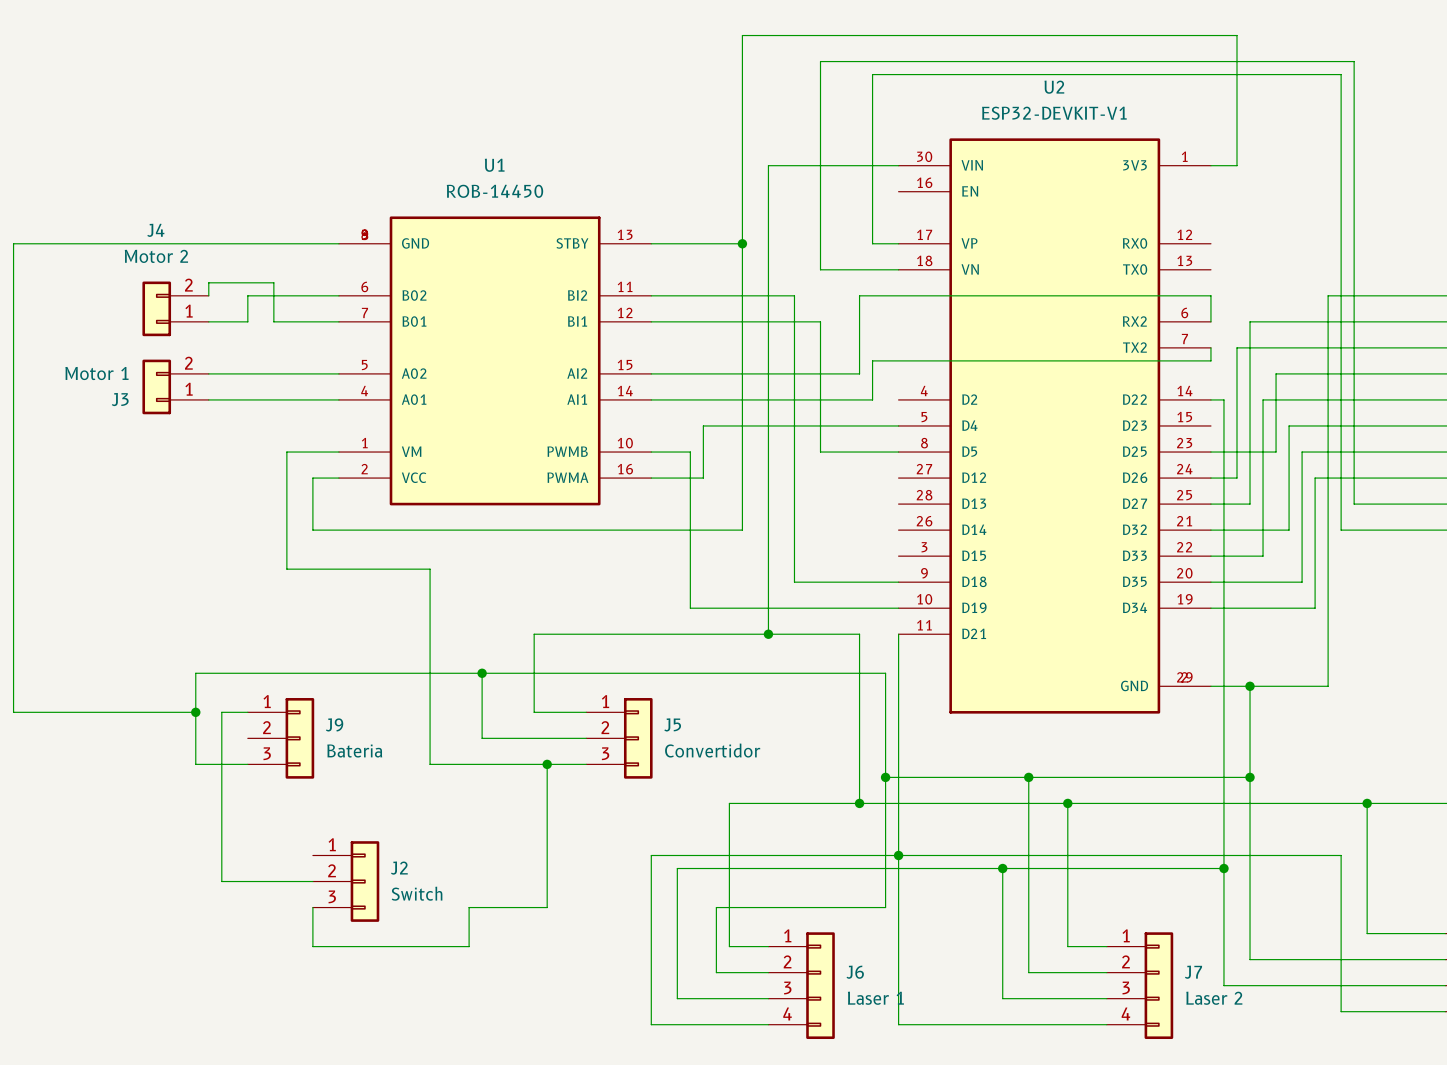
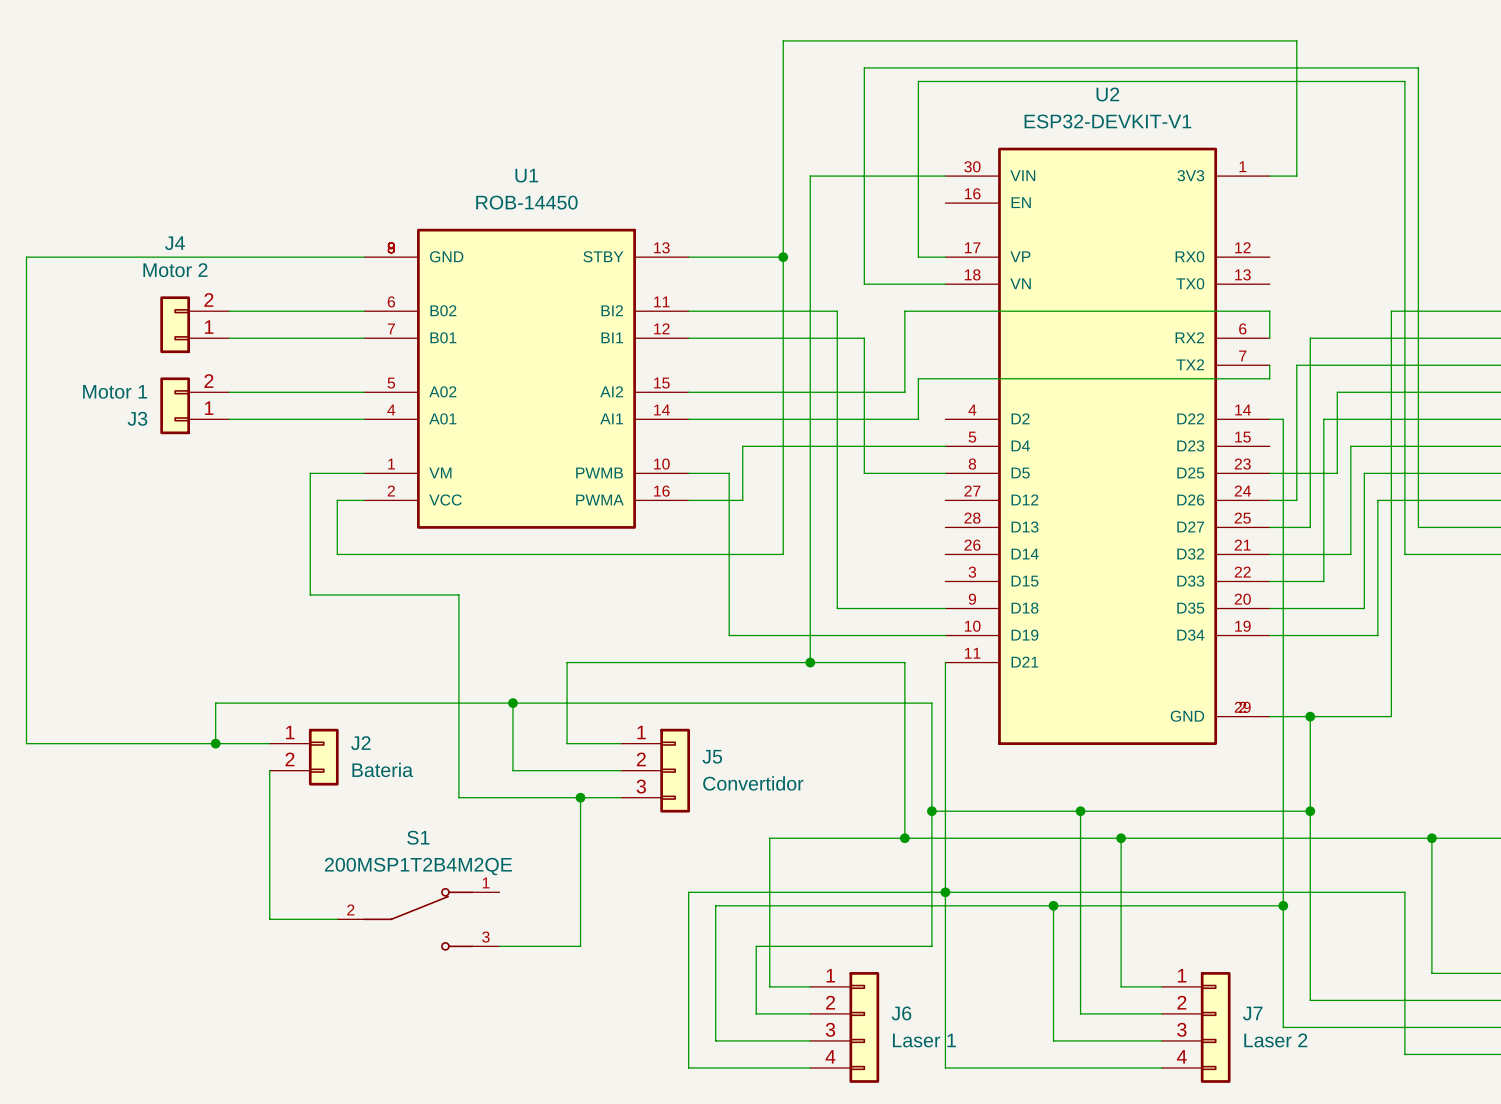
wire: (208, 295) (208, 282) (273, 282) (273, 321) -> (229, 311) (269, 311)
wire: (247, 295) (247, 321) -> (296, 338) (269, 338)
wire: (195, 712) (195, 764) (247, 764) -> (215, 743) (242, 743)
wire: (221, 712) (221, 881) (247, 881) -> (269, 770) (269, 919)
J9: Bateria (281, 738) -> none
J2 symbol: [312, 841, 380, 922] -> [269, 728, 339, 786]
S1: none -> 200MSP1T2B4M2QE (418, 919)
J2 value: Switch (417, 893) -> Bateria (382, 769)
wire: (312, 907) (312, 946) (469, 946) (469, 907) -> none

